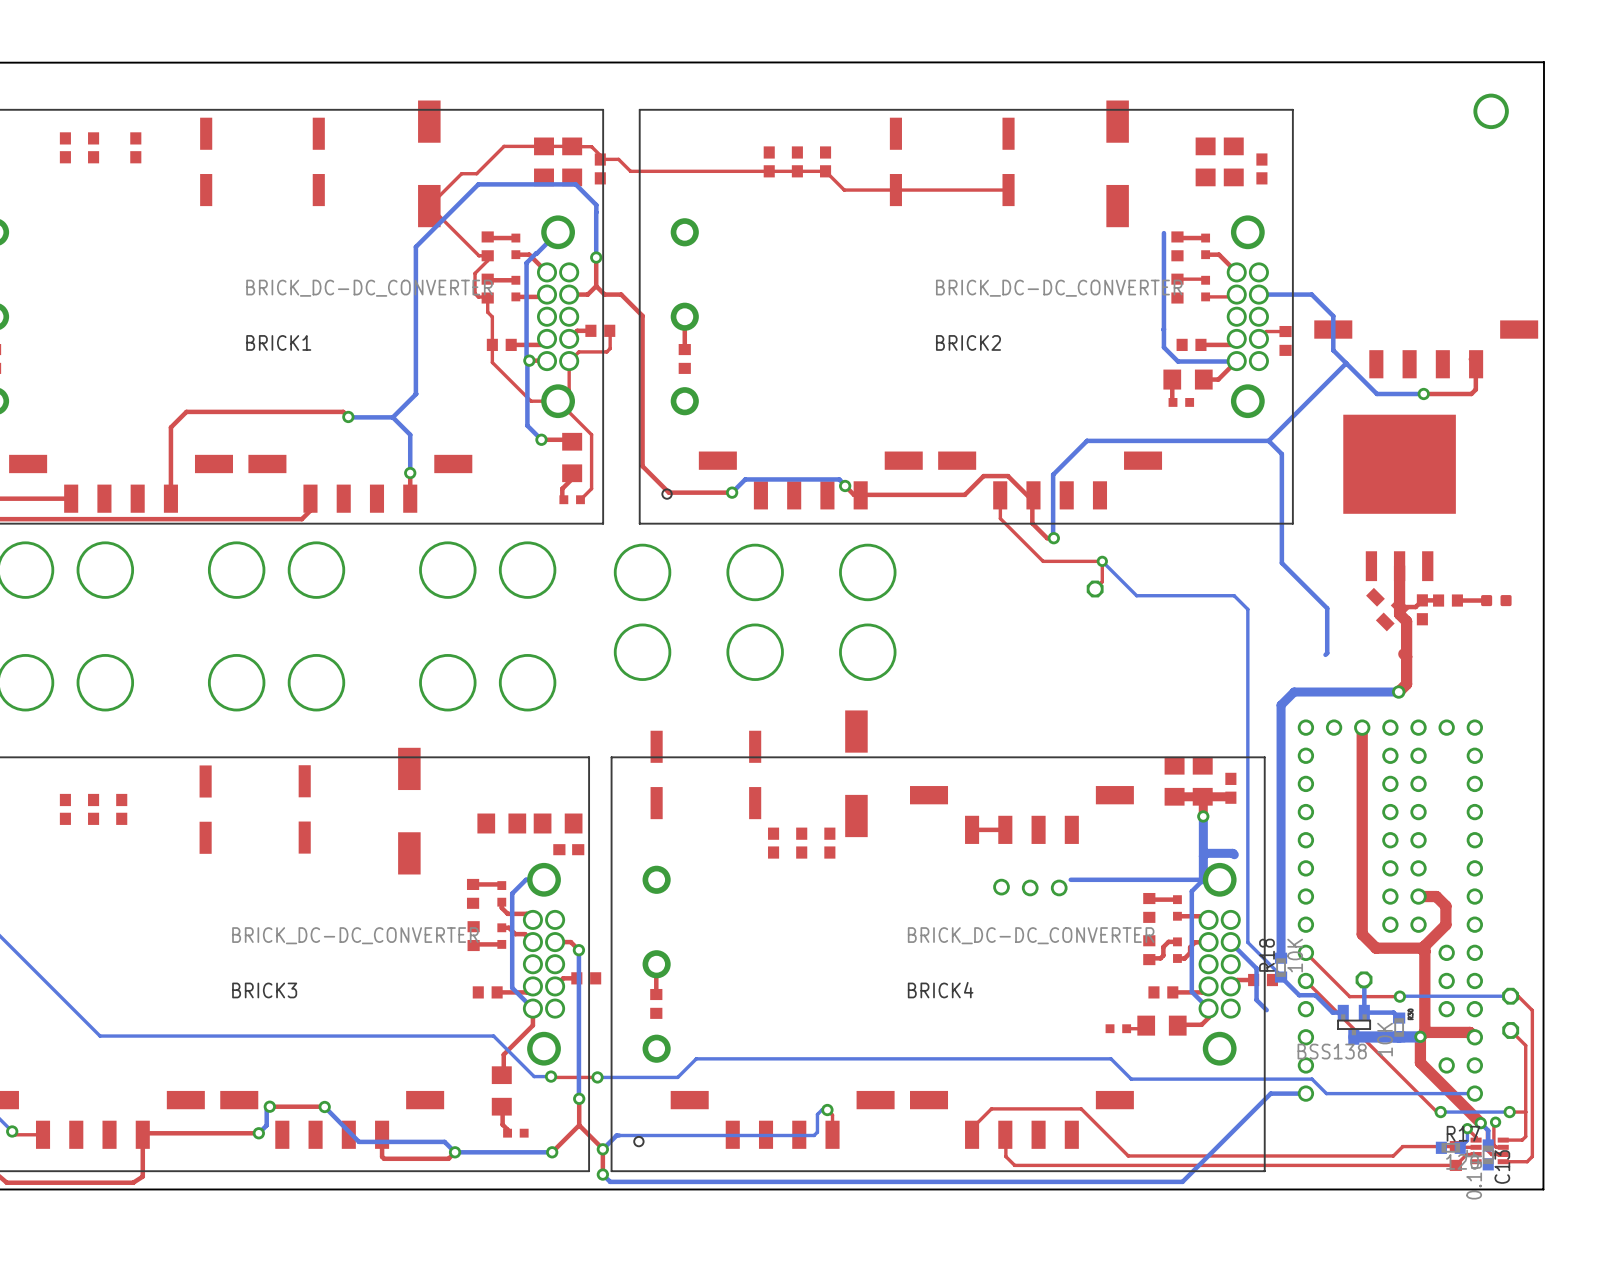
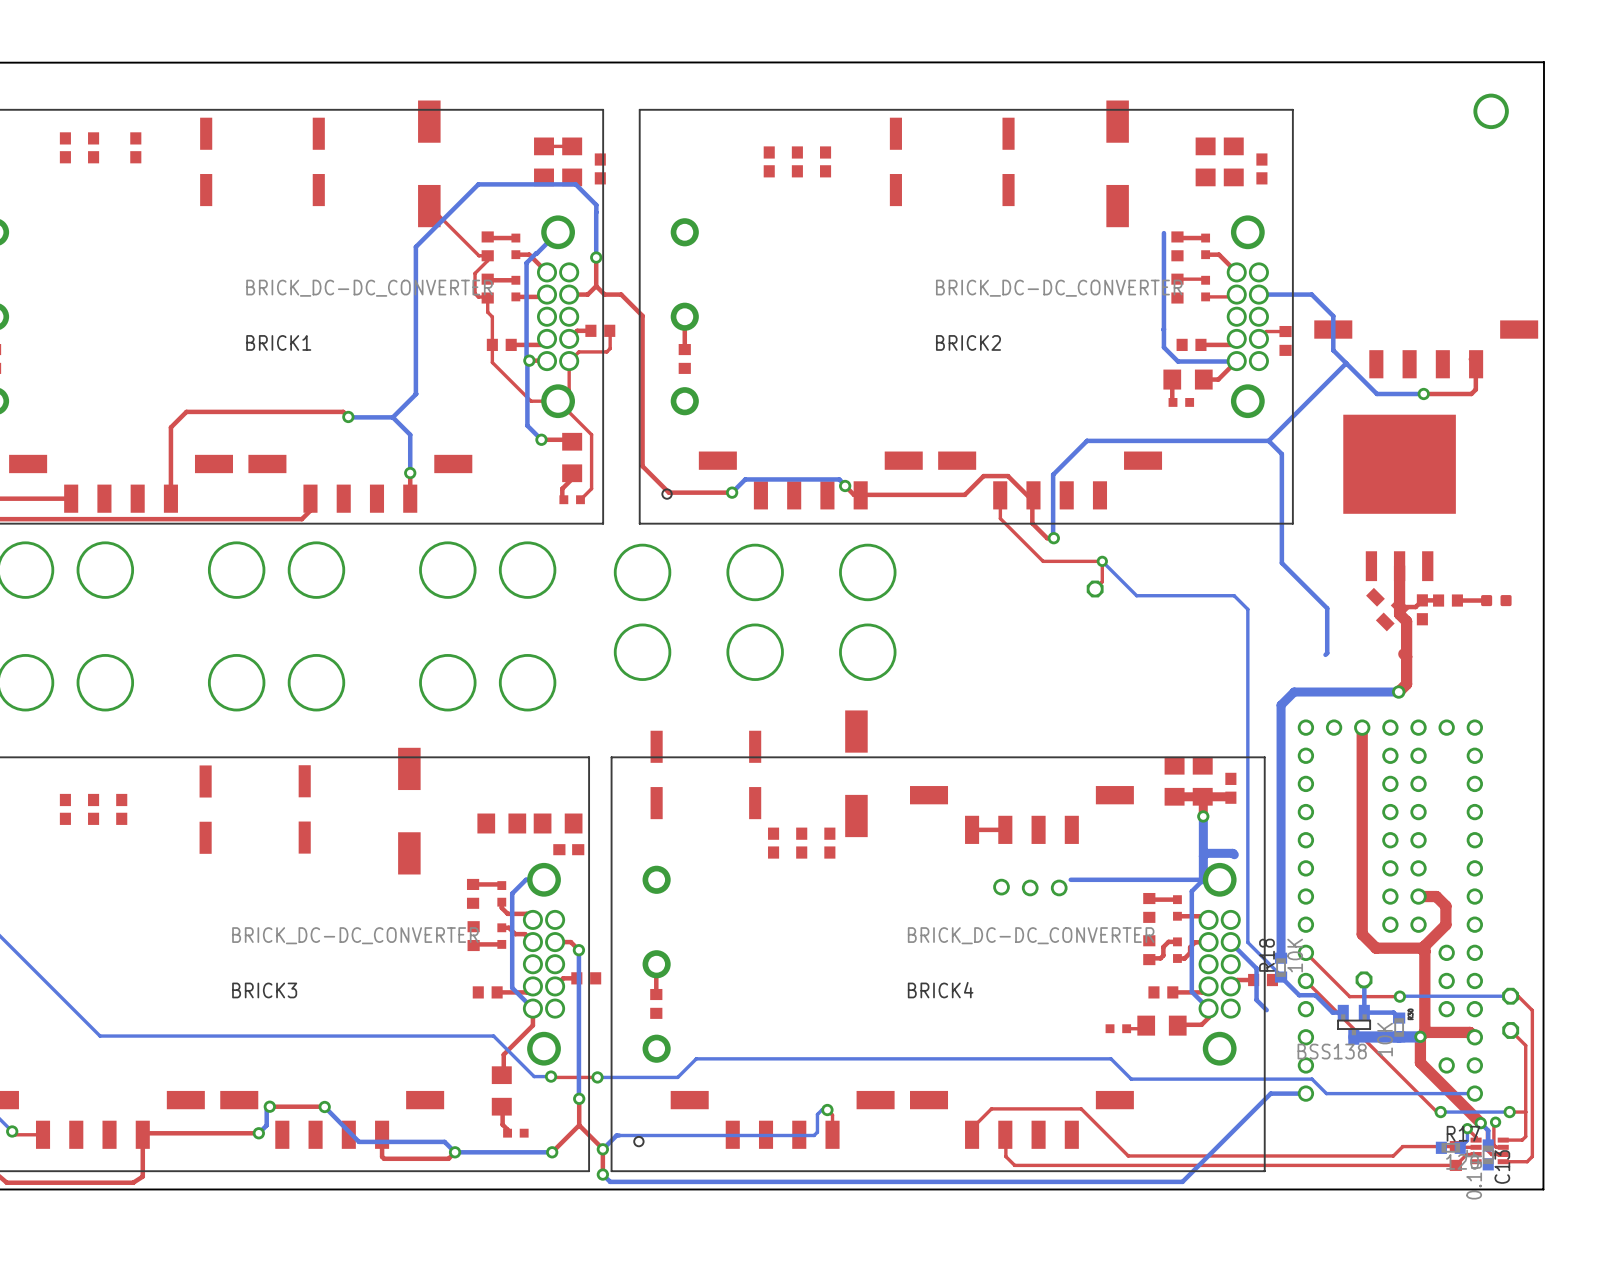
top track: (544, 146) (504, 146) (476, 173) (461, 173) (429, 206) -> none
top track: (572, 146) (591, 146) (600, 155) -> none
top track: (600, 159) (618, 159) (630, 171) (825, 171) (844, 190) (1008, 190) -> none

